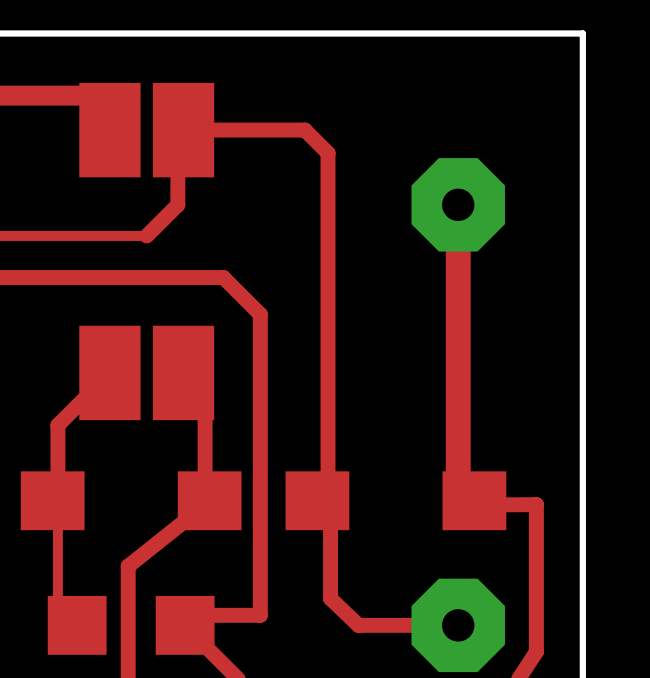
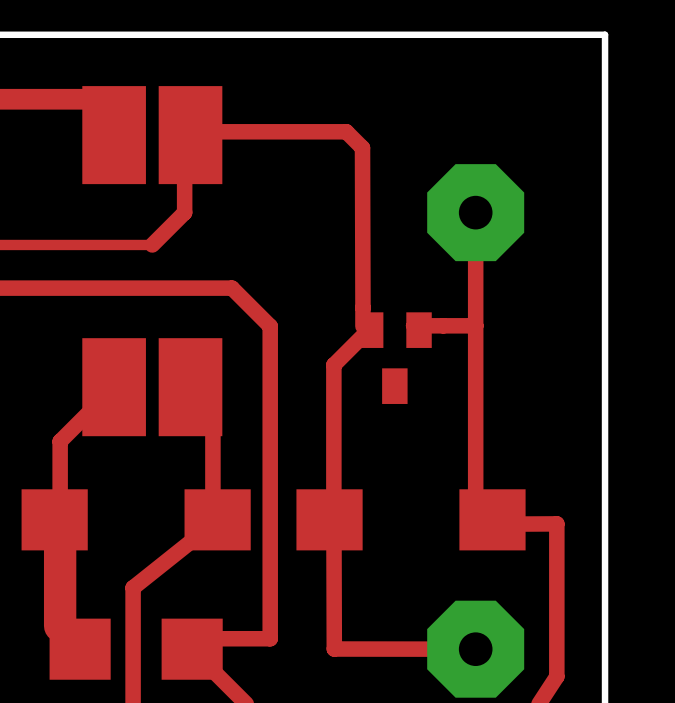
top track: none -> (200, 131) (346, 131) (362, 147) (362, 326) (370, 330) (333, 365) (333, 505)
top track: (183, 130) (304, 130) (328, 153) (328, 500) (317, 500) (330, 518) (330, 598) (358, 625) (458, 625) -> (333, 505) (334, 649) (475, 649)
top track width: thick (458, 204) (458, 485) -> thin (475, 212) (475, 503)
top track: none -> (475, 325) (427, 325)
part: none -> (394, 358)
top track width: thin (57, 504) (57, 603) -> thick (60, 524) (60, 626)

